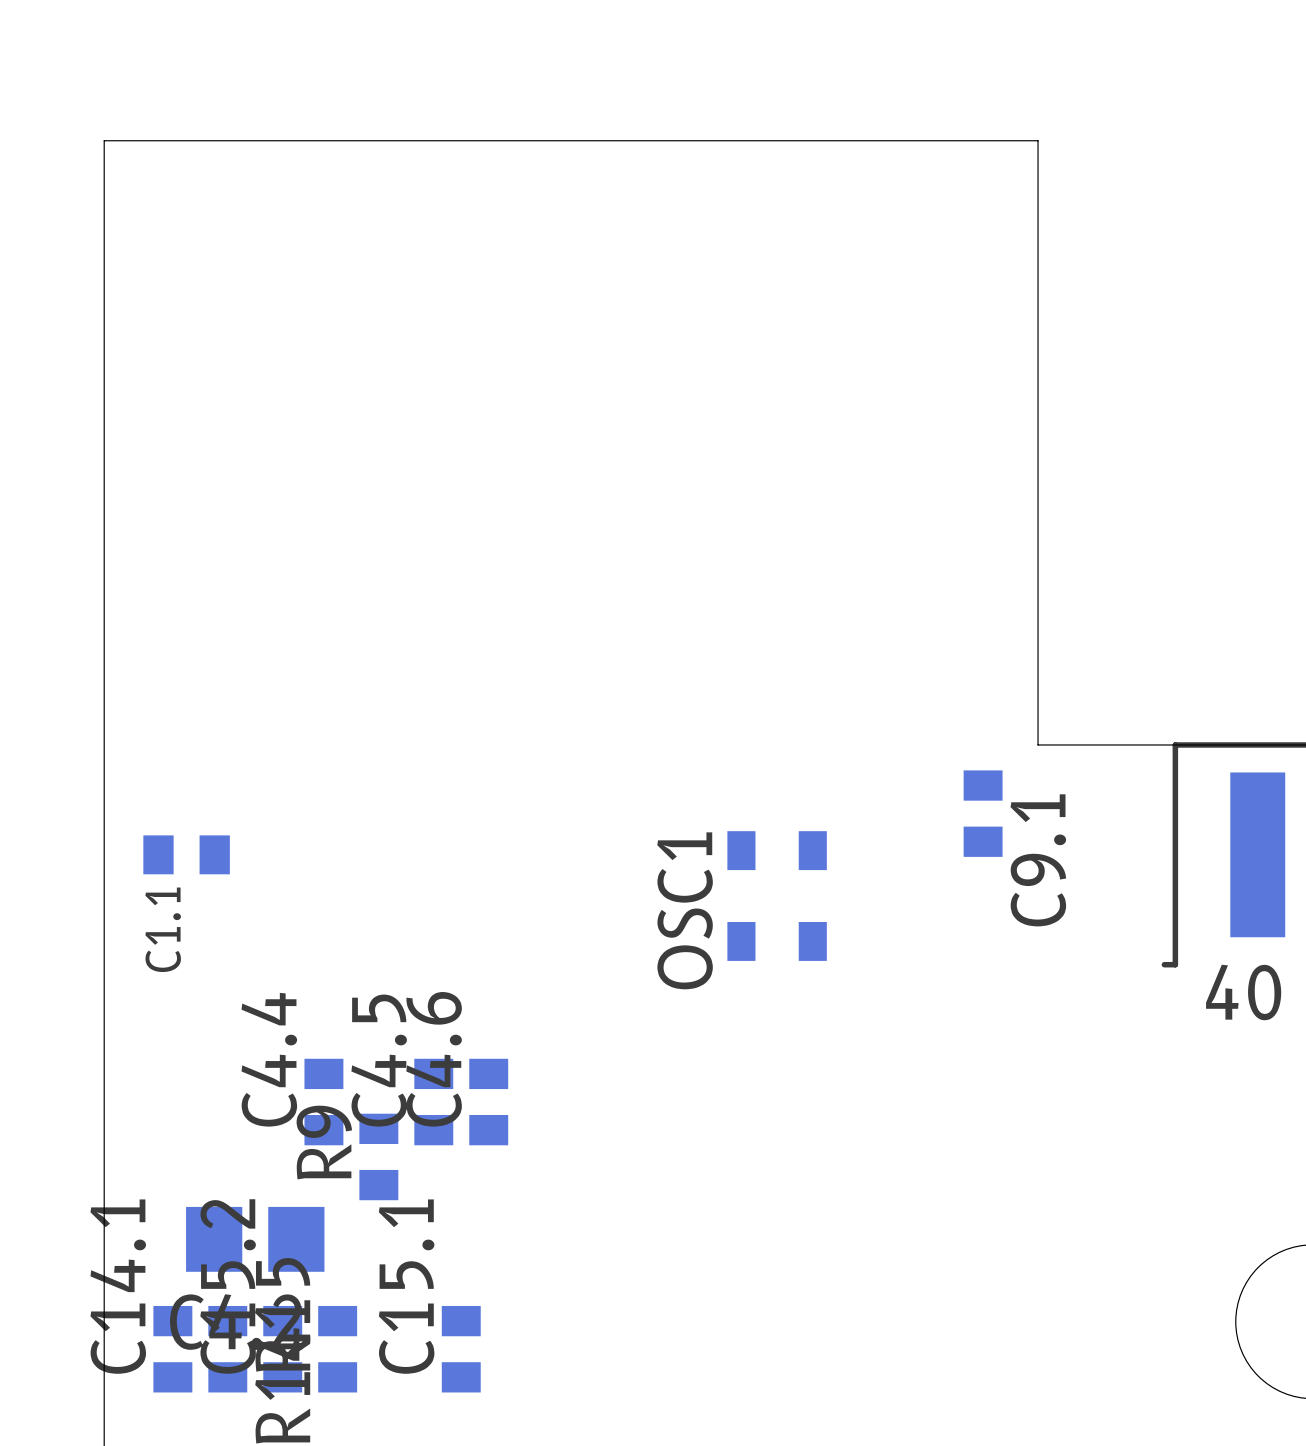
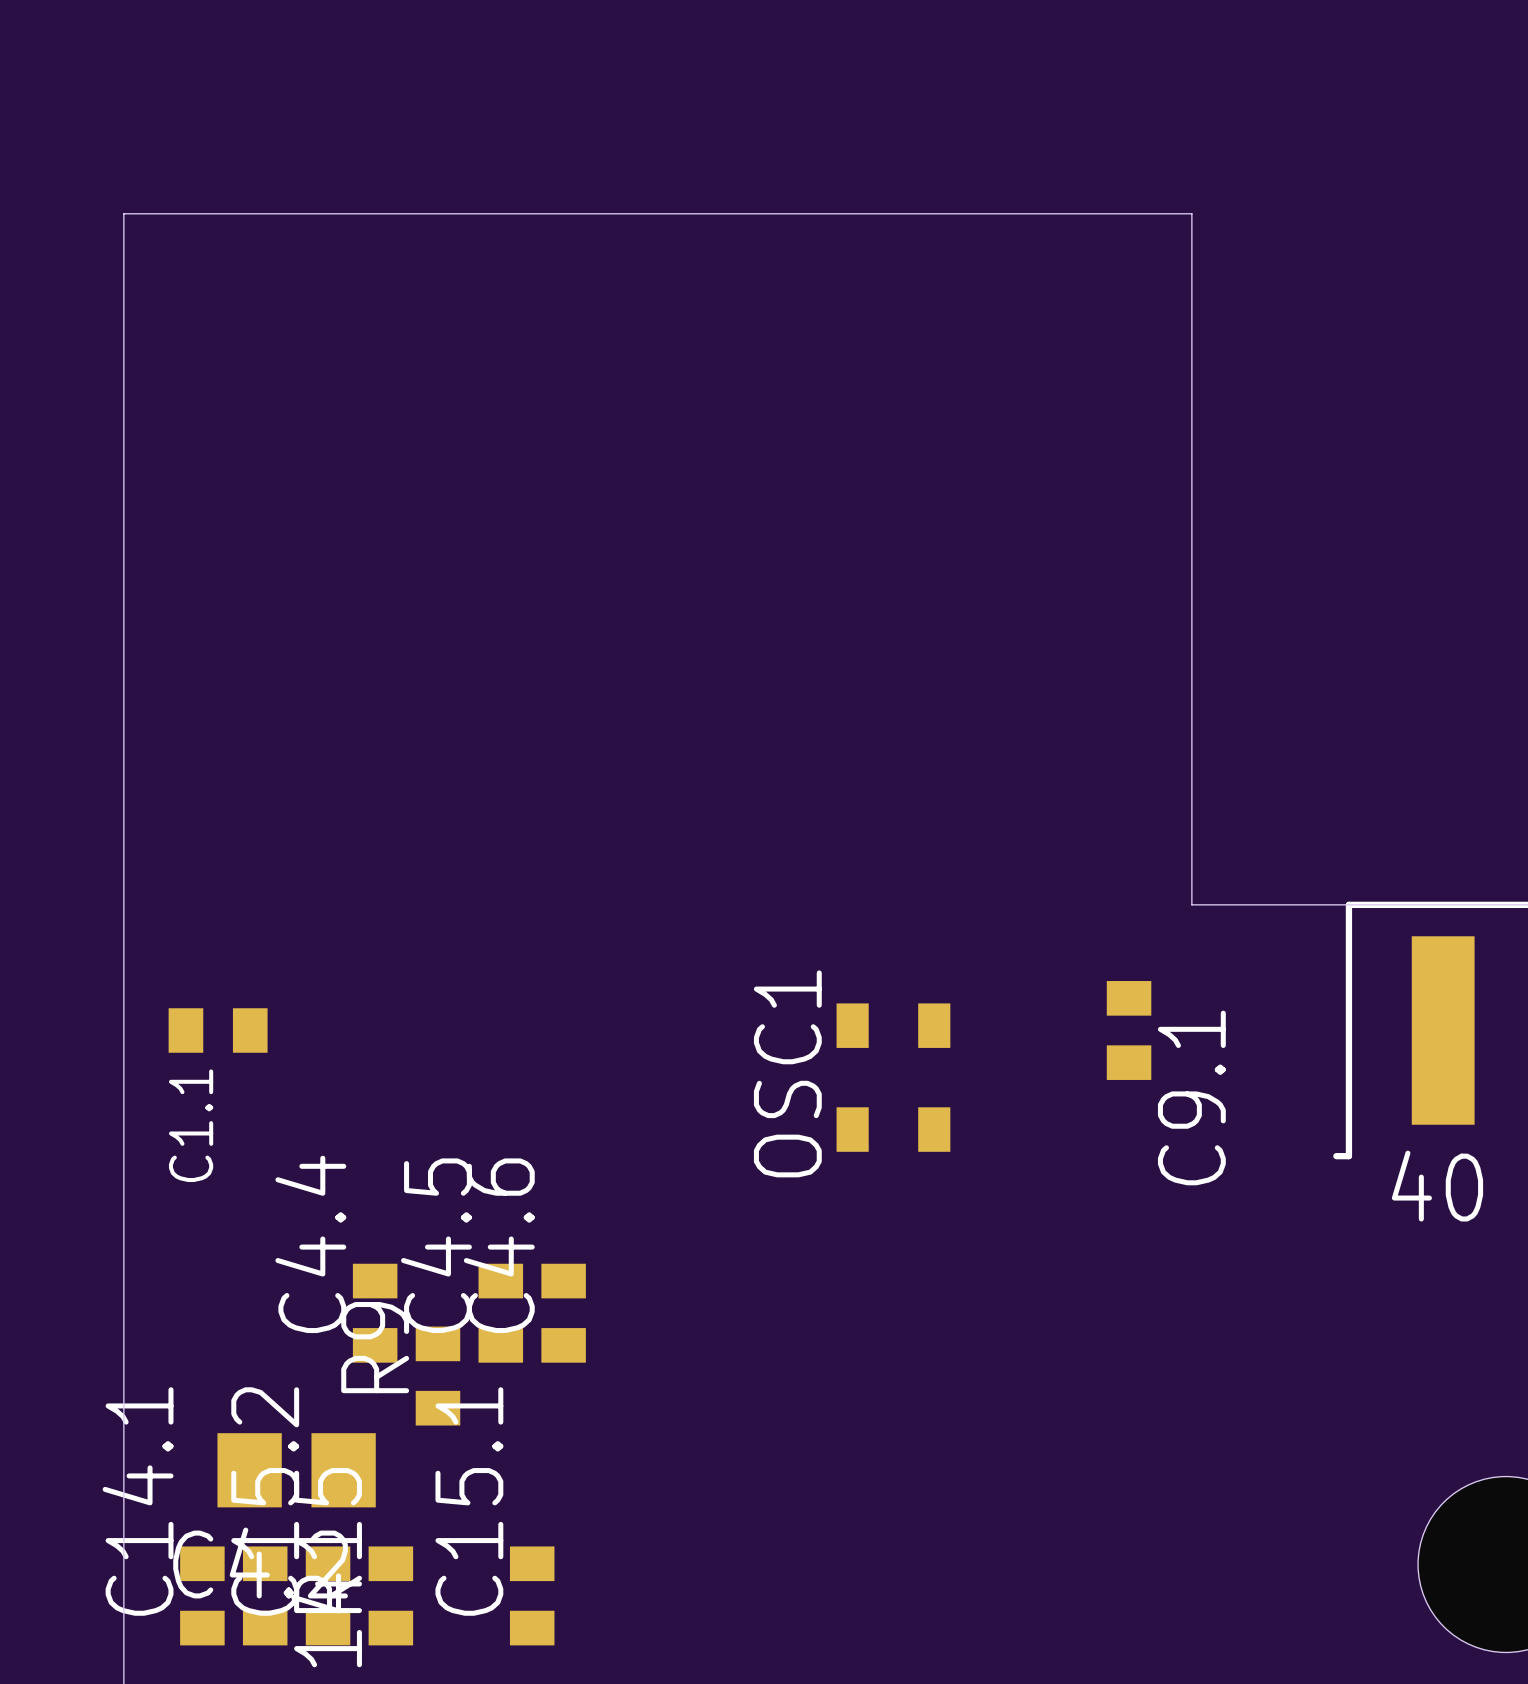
C9.1 position: (983, 813) -> (1129, 1030)

